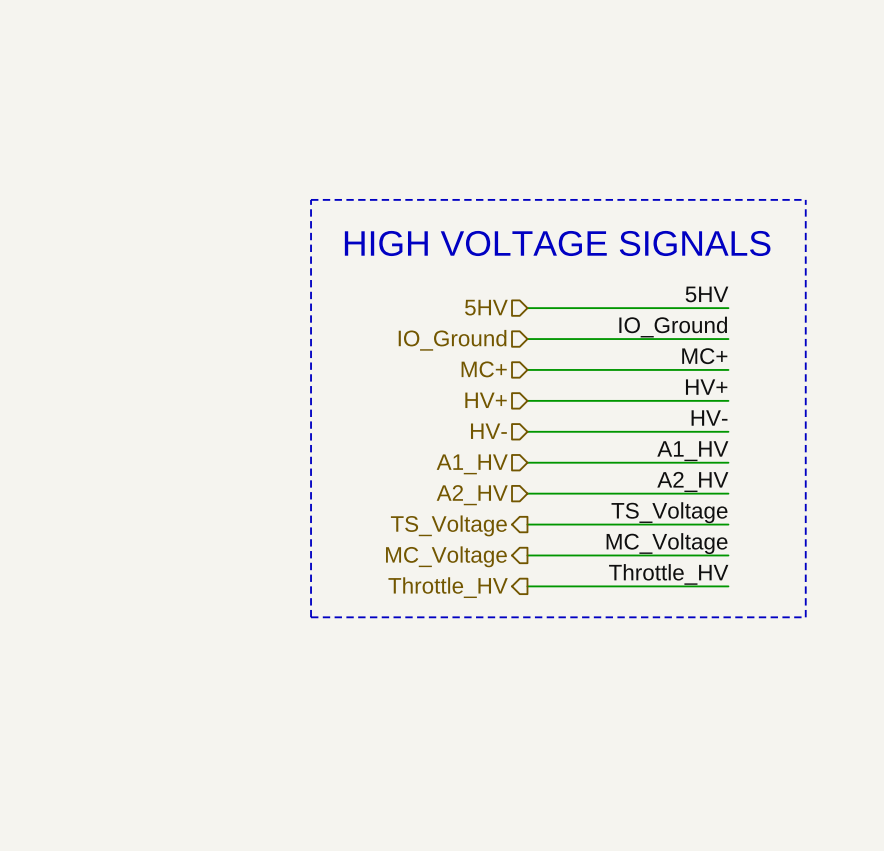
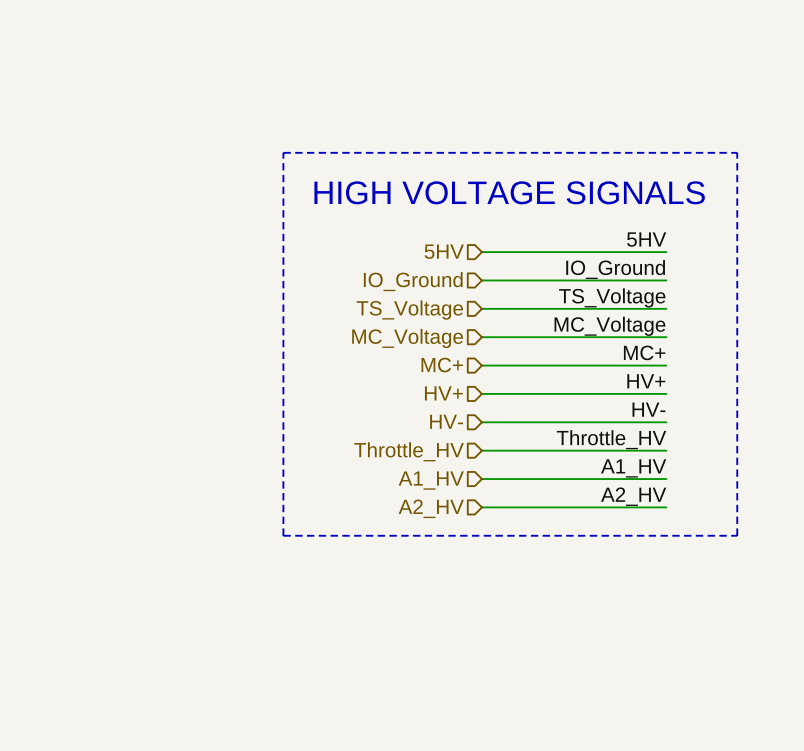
label: MC+ (704, 356) -> TS_Voltage (612, 297)
hierarchical label: MC+ (484, 369) -> TS_Voltage (409, 310)
label: HV+ (706, 387) -> MC_Voltage (609, 326)
hierarchical label: HV+ (486, 400) -> MC_Voltage (407, 338)
label: HV- (709, 418) -> MC+ (644, 352)
hierarchical label: HV- (488, 431) -> MC+ (442, 365)
label: A1_HV (692, 451) -> HV+ (646, 381)
hierarchical label: A1_HV (472, 464) -> HV+ (443, 393)
label: A2_HV (692, 481) -> HV- (648, 409)
hierarchical label: A2_HV (472, 495) -> HV- (446, 421)
label: TS_Voltage (669, 512) -> Throttle_HV (611, 439)
hierarchical label shape: output (448, 525) -> input (409, 451)
hierarchical label: TS_Voltage (448, 525) -> Throttle_HV (409, 451)
label: MC_Voltage (667, 543) -> A1_HV (633, 468)
hierarchical label shape: output (446, 556) -> input (431, 480)
hierarchical label: MC_Voltage (446, 556) -> A1_HV (431, 480)
label: Throttle_HV (668, 574) -> A2_HV (633, 496)
hierarchical label shape: output (448, 587) -> input (431, 508)
hierarchical label: Throttle_HV (448, 587) -> A2_HV (431, 508)

